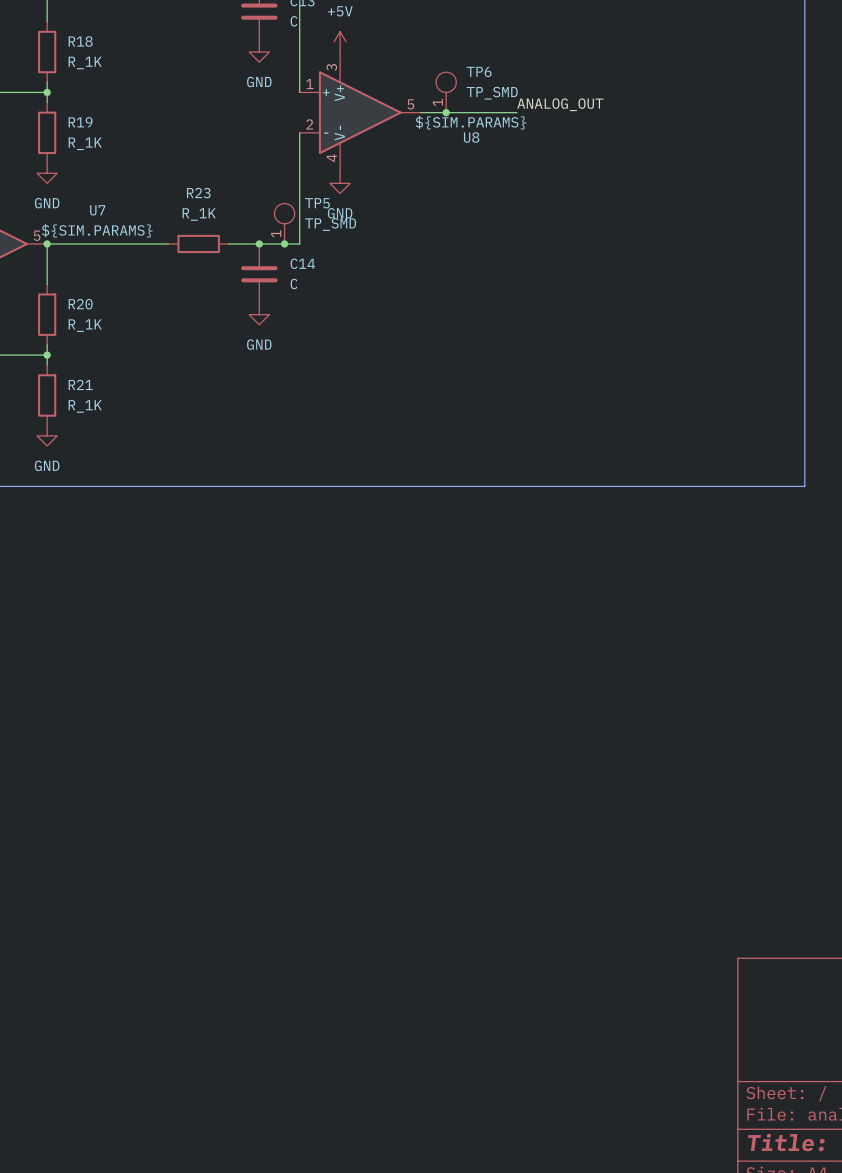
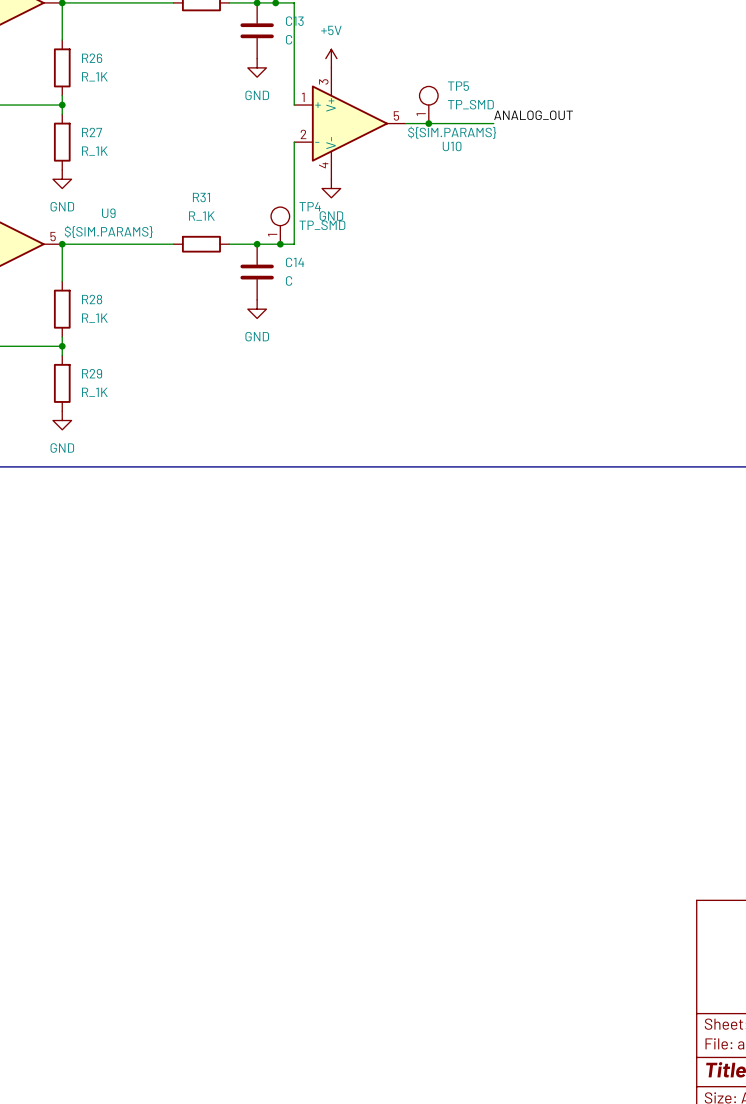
R18 name: R18 (80, 41) -> R26 (92, 58)
TP6 name: TP6 (479, 71) -> TP5 (458, 86)
R19 name: R19 (80, 122) -> R27 (92, 132)
U8 name: U8 (471, 137) -> U10 (452, 146)
R23 name: R23 (198, 193) -> R31 (201, 197)
TP5 name: TP5 (317, 203) -> TP4 (310, 206)
U7 name: U7 (97, 210) -> U9 (108, 213)
R20 name: R20 (80, 304) -> R28 (92, 299)
R21 name: R21 (80, 384) -> R29 (92, 373)

